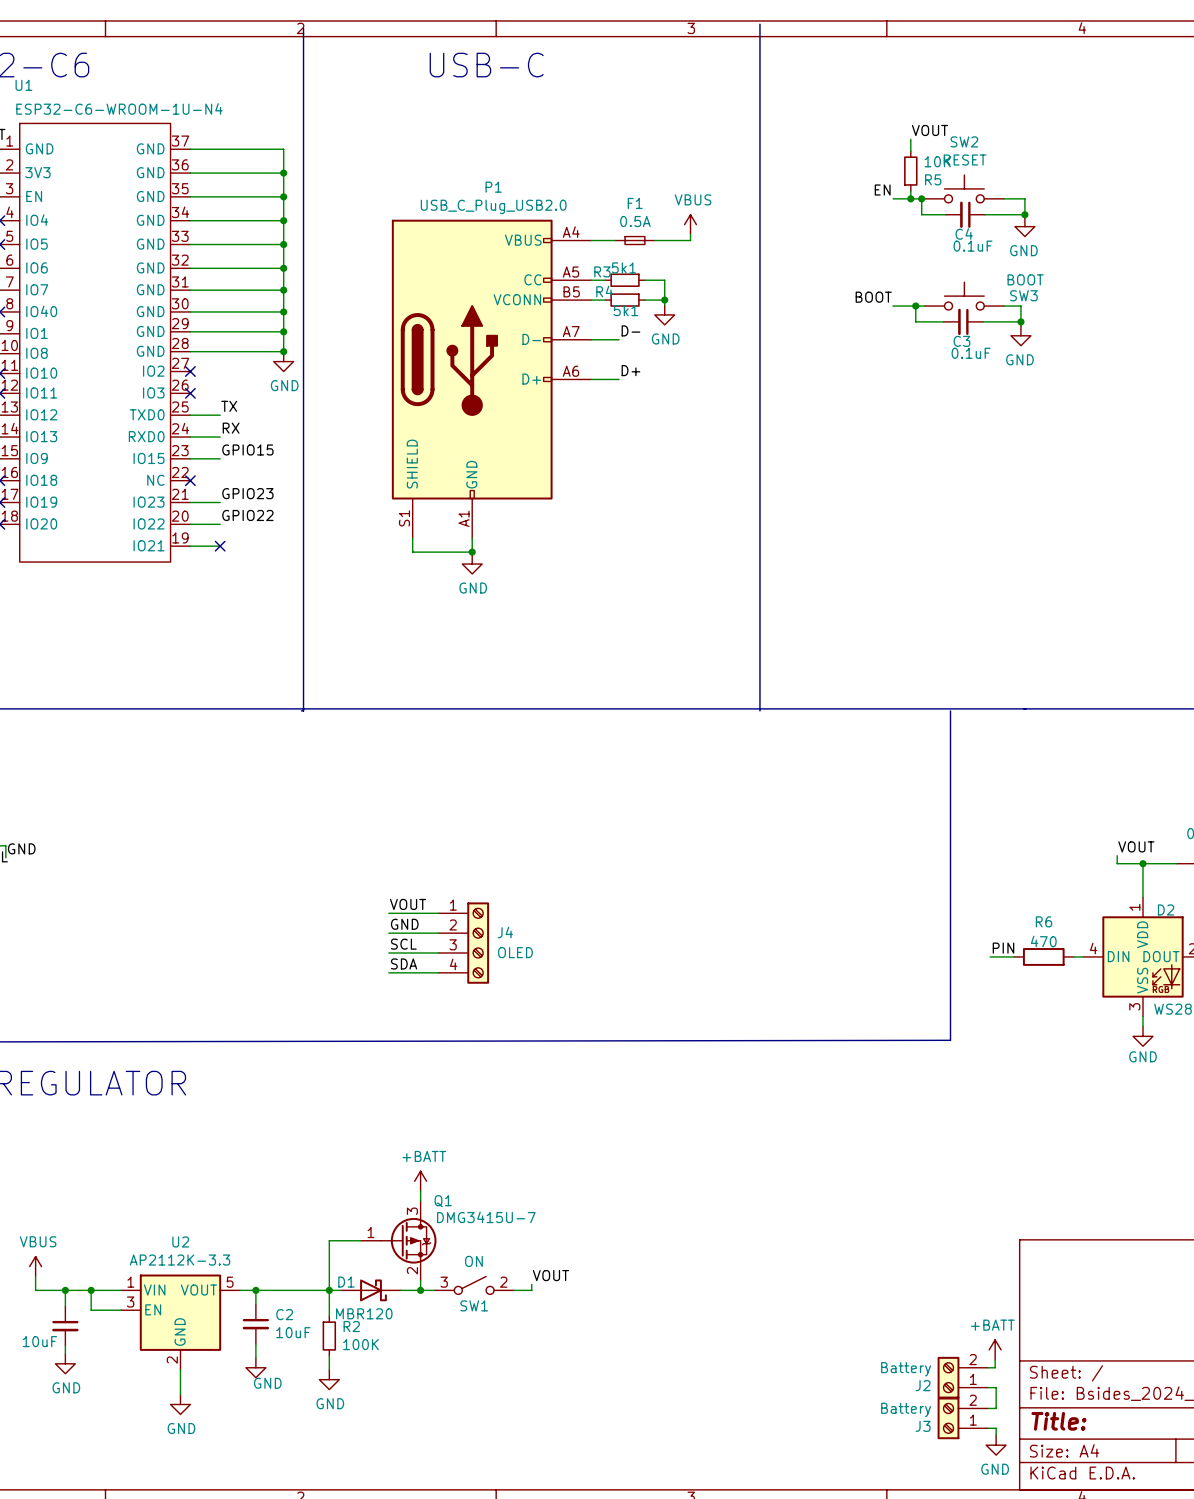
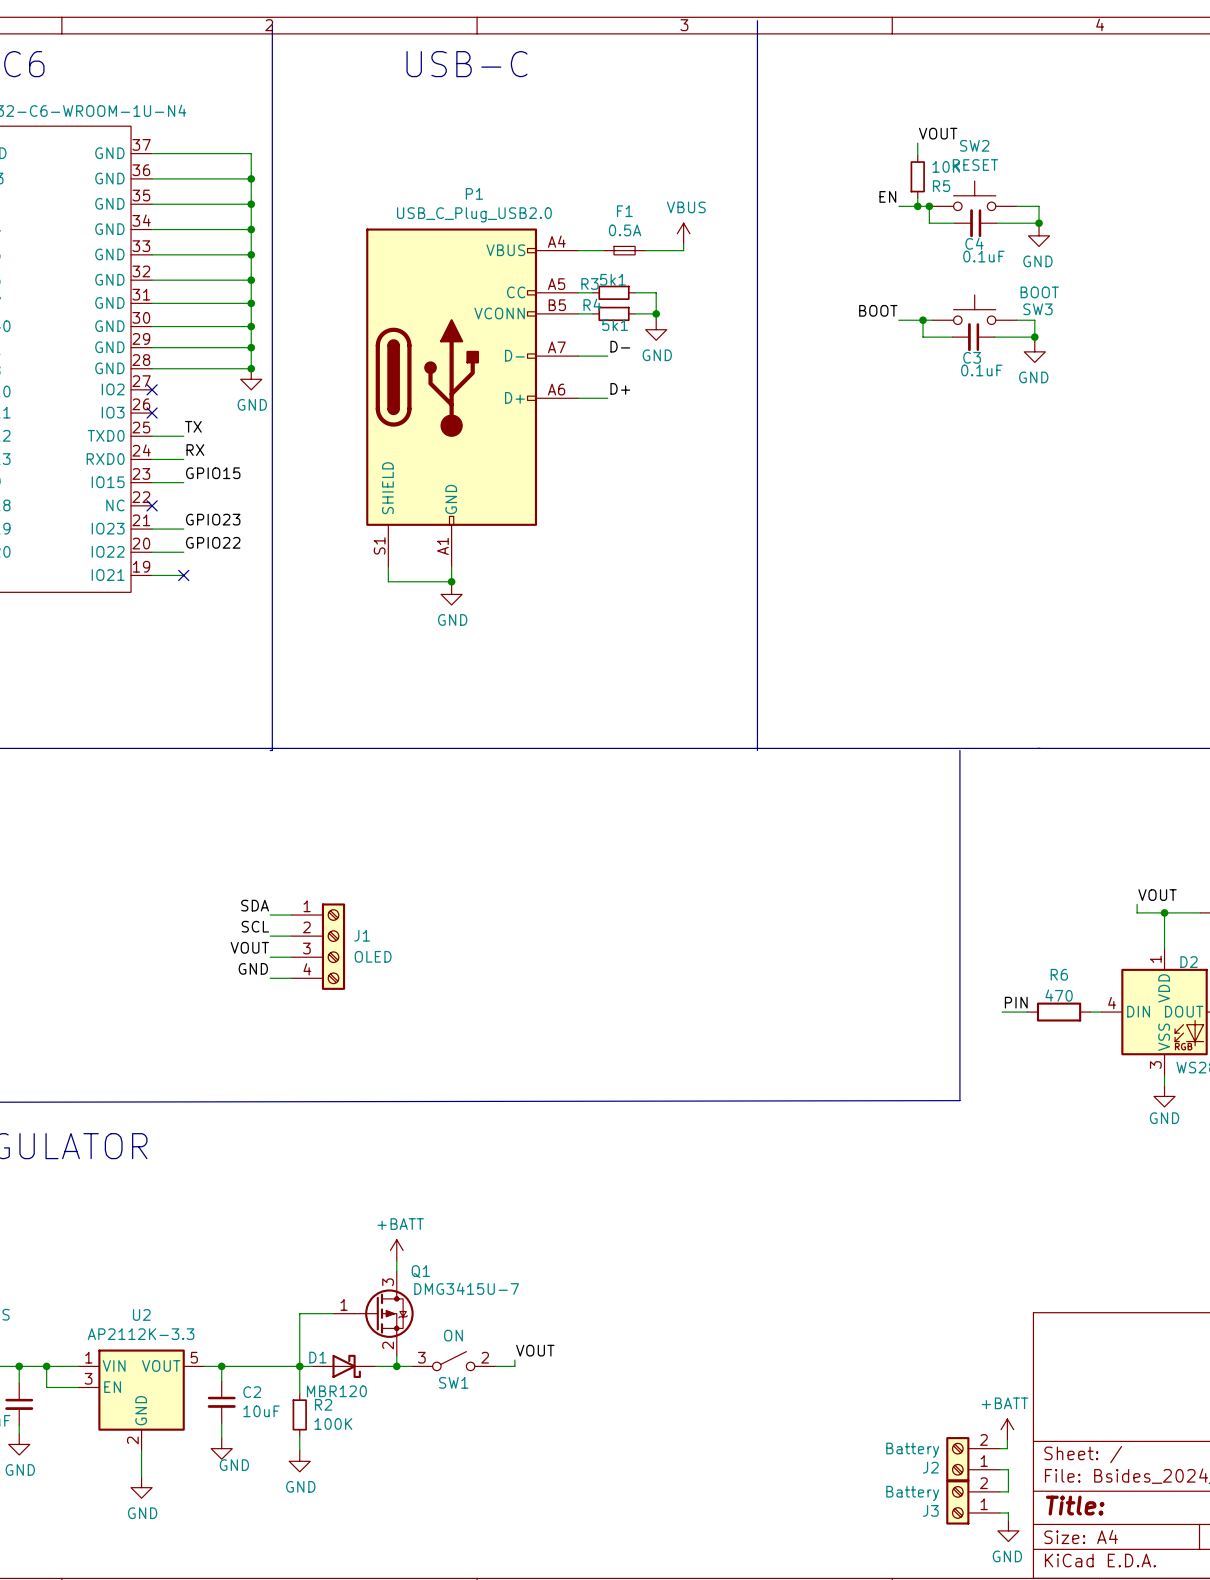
wire: none -> (270, 915) (291, 915)
wire: none -> (270, 936) (291, 936)
J1: none -> OLED (318, 946)
label position: VOUT (408, 904) -> VOUT (249, 947)
wire: none -> (270, 957) (291, 957)
wire: (388, 913) (438, 913) -> none
label position: GND (404, 924) -> GND (253, 968)
wire: none -> (270, 978) (291, 978)
wire: (388, 933) (438, 933) -> none
J4: OLED (463, 943) -> none
label position: SCL (403, 944) -> SCL (255, 926)
wire: (388, 952) (438, 952) -> none
label position: SDA (404, 963) -> SDA (255, 905)
wire: (388, 972) (438, 972) -> none

